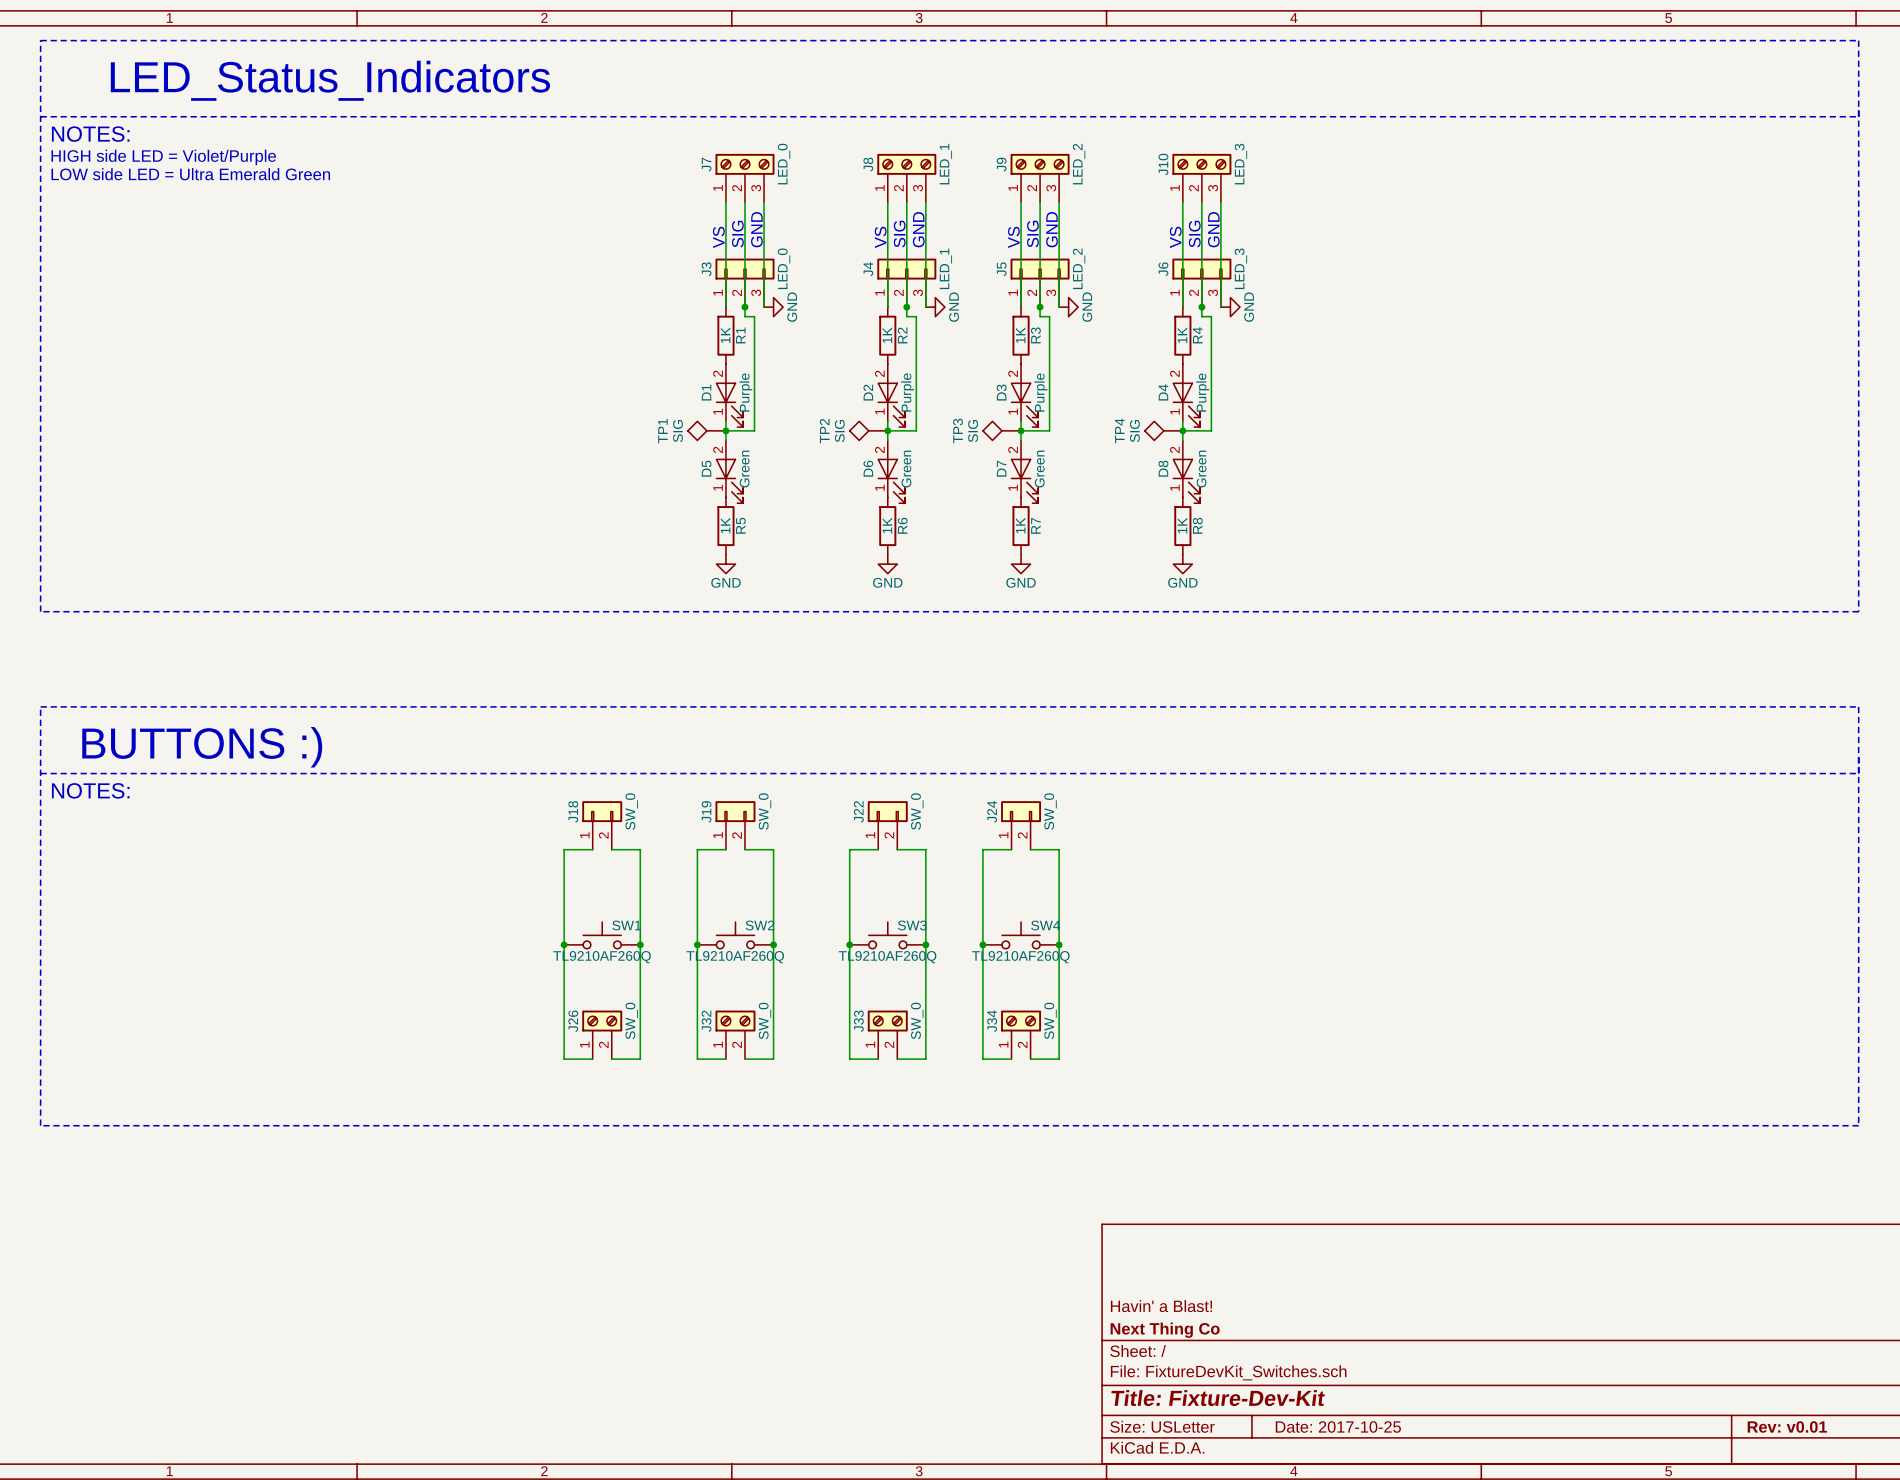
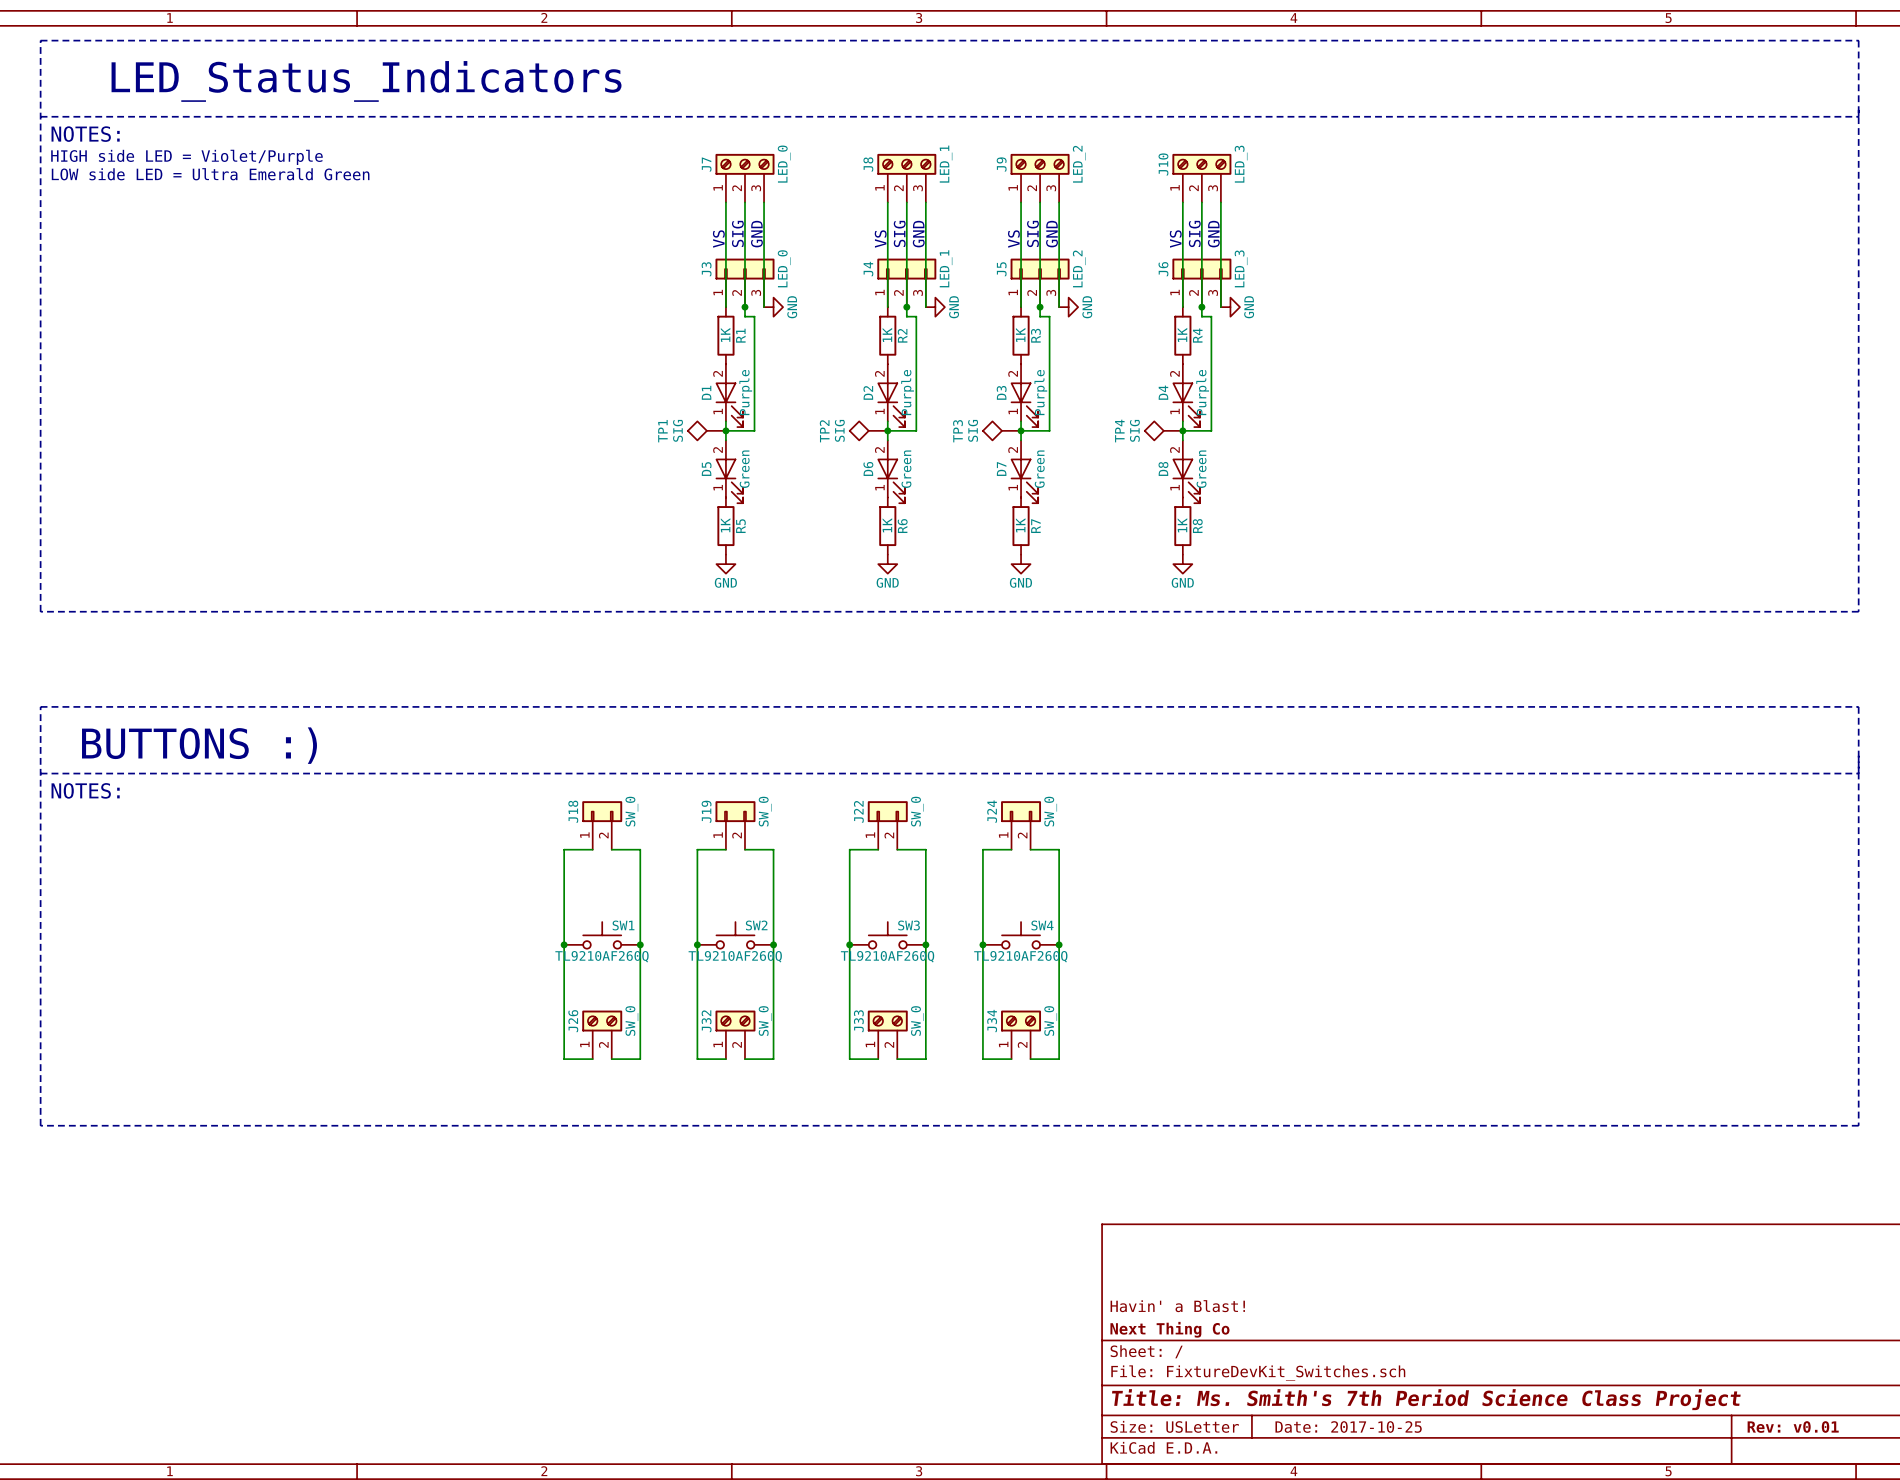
title block: Title: Fixture-Dev-Kit (1218, 1398) -> Title: Ms. Smith's 7th Period Science Class Project (1426, 1399)

